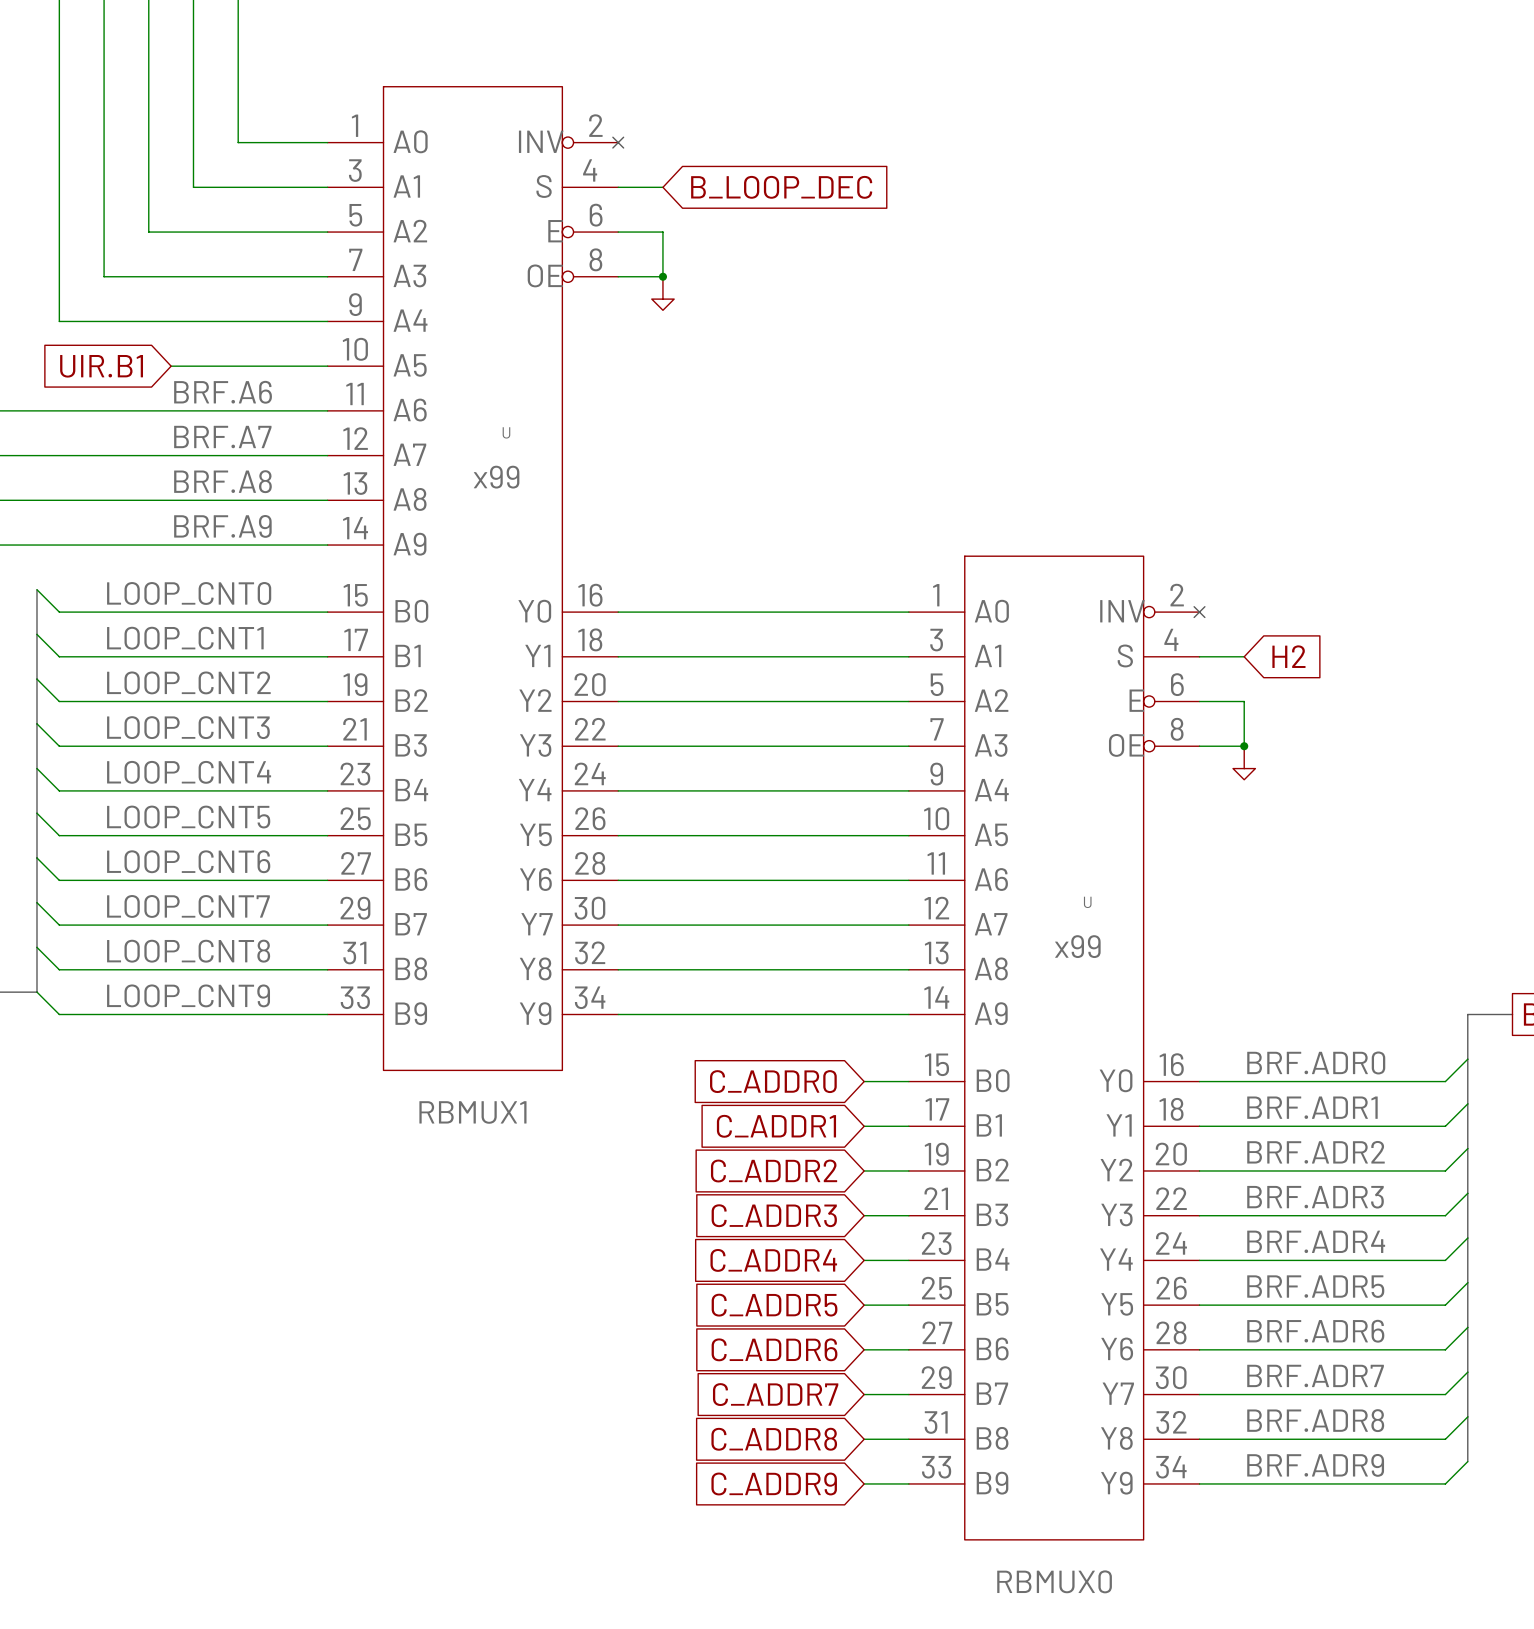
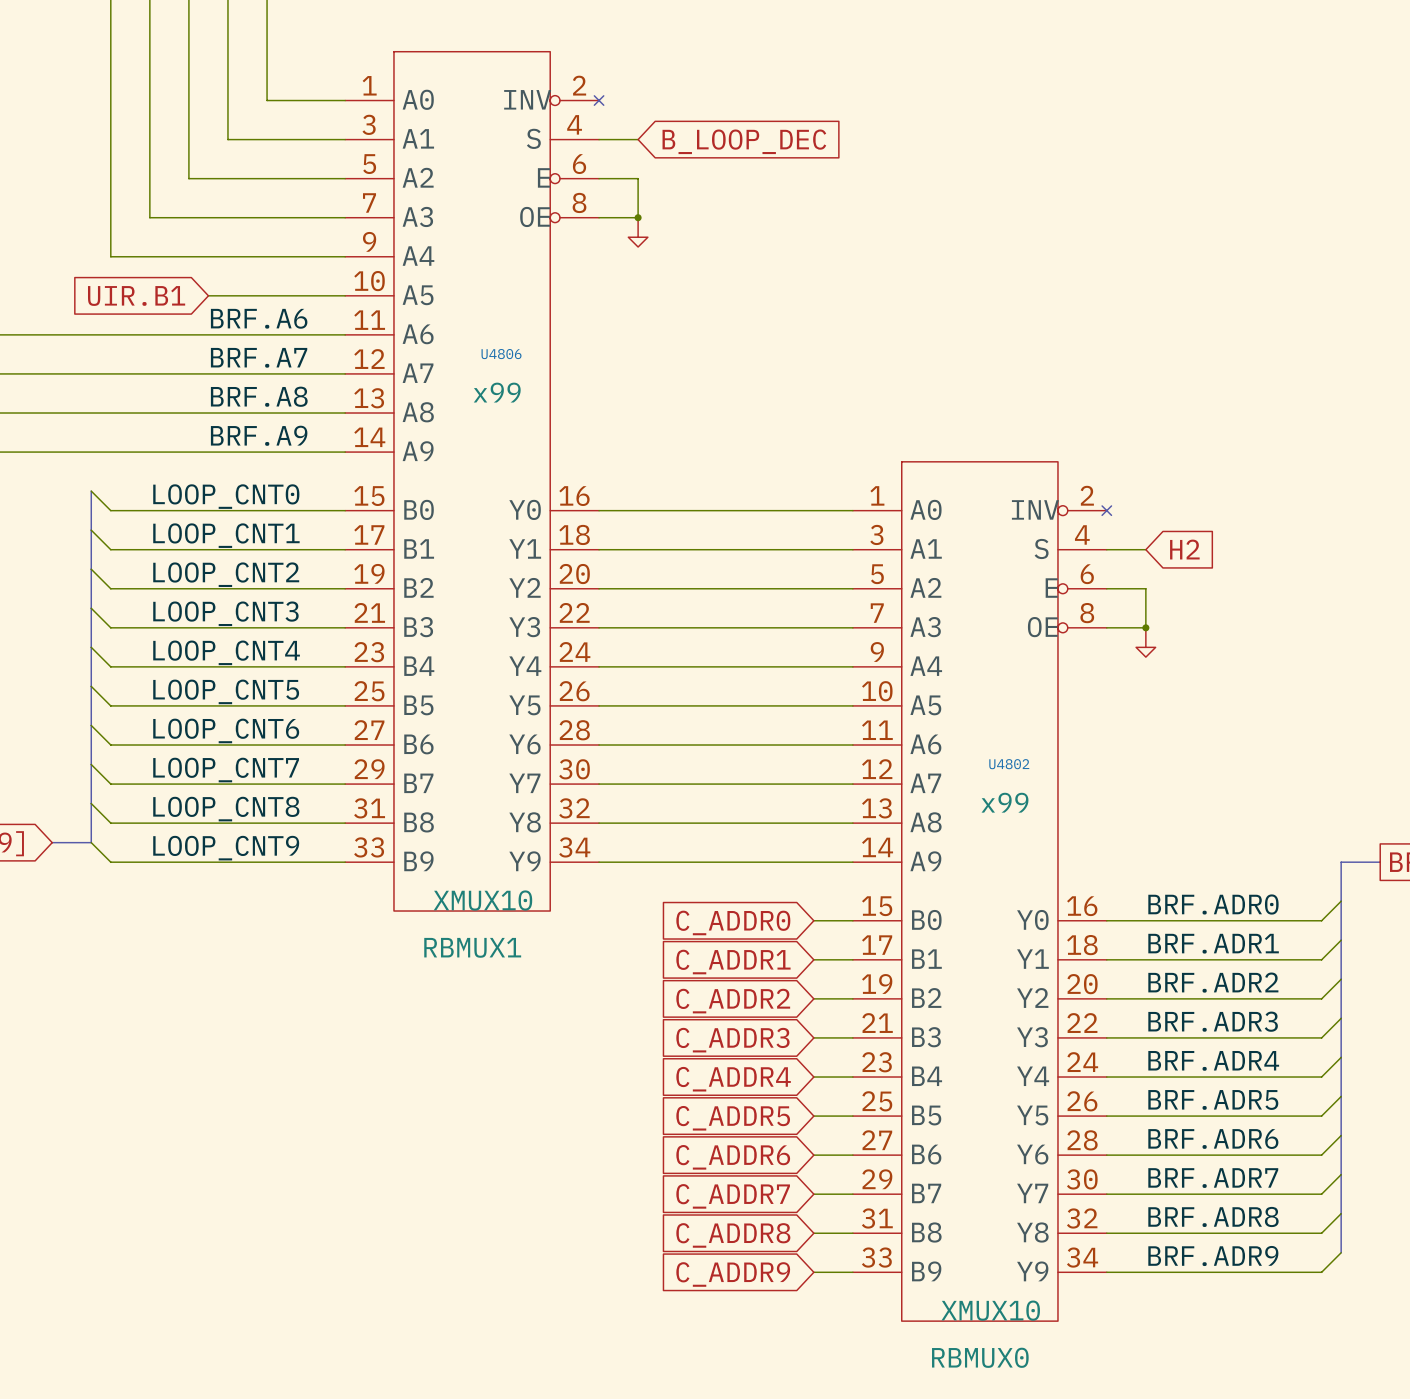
U name: U (506, 432) -> U4806 (501, 354)
U name: U (1087, 902) -> U4802 (1009, 764)
U value: none -> XMUX10 (482, 900)
U value: none -> XMUX10 (990, 1310)

